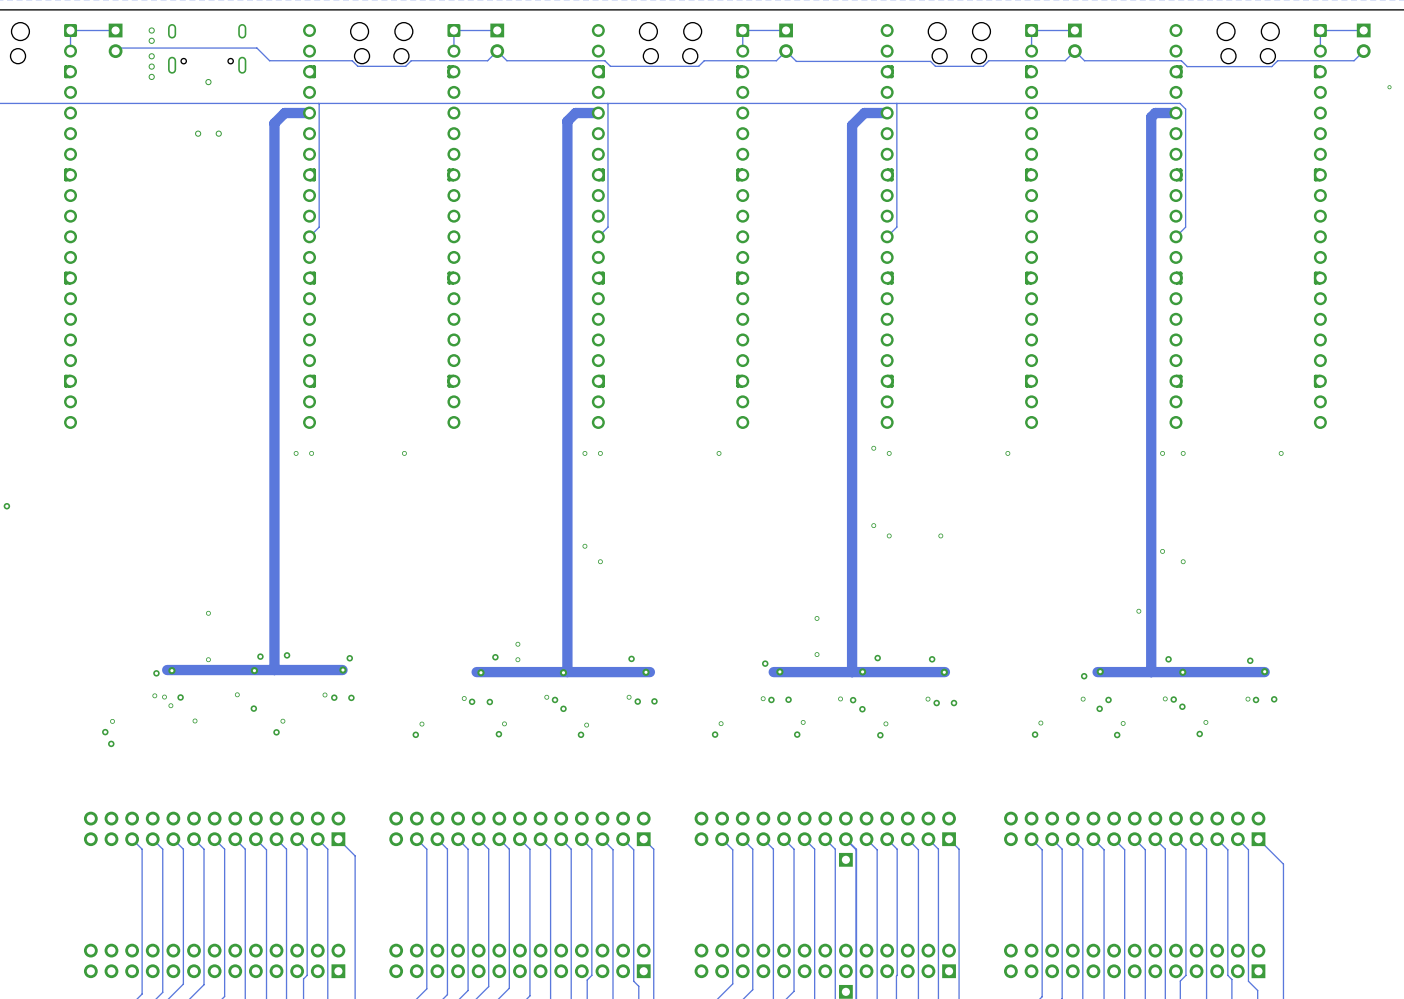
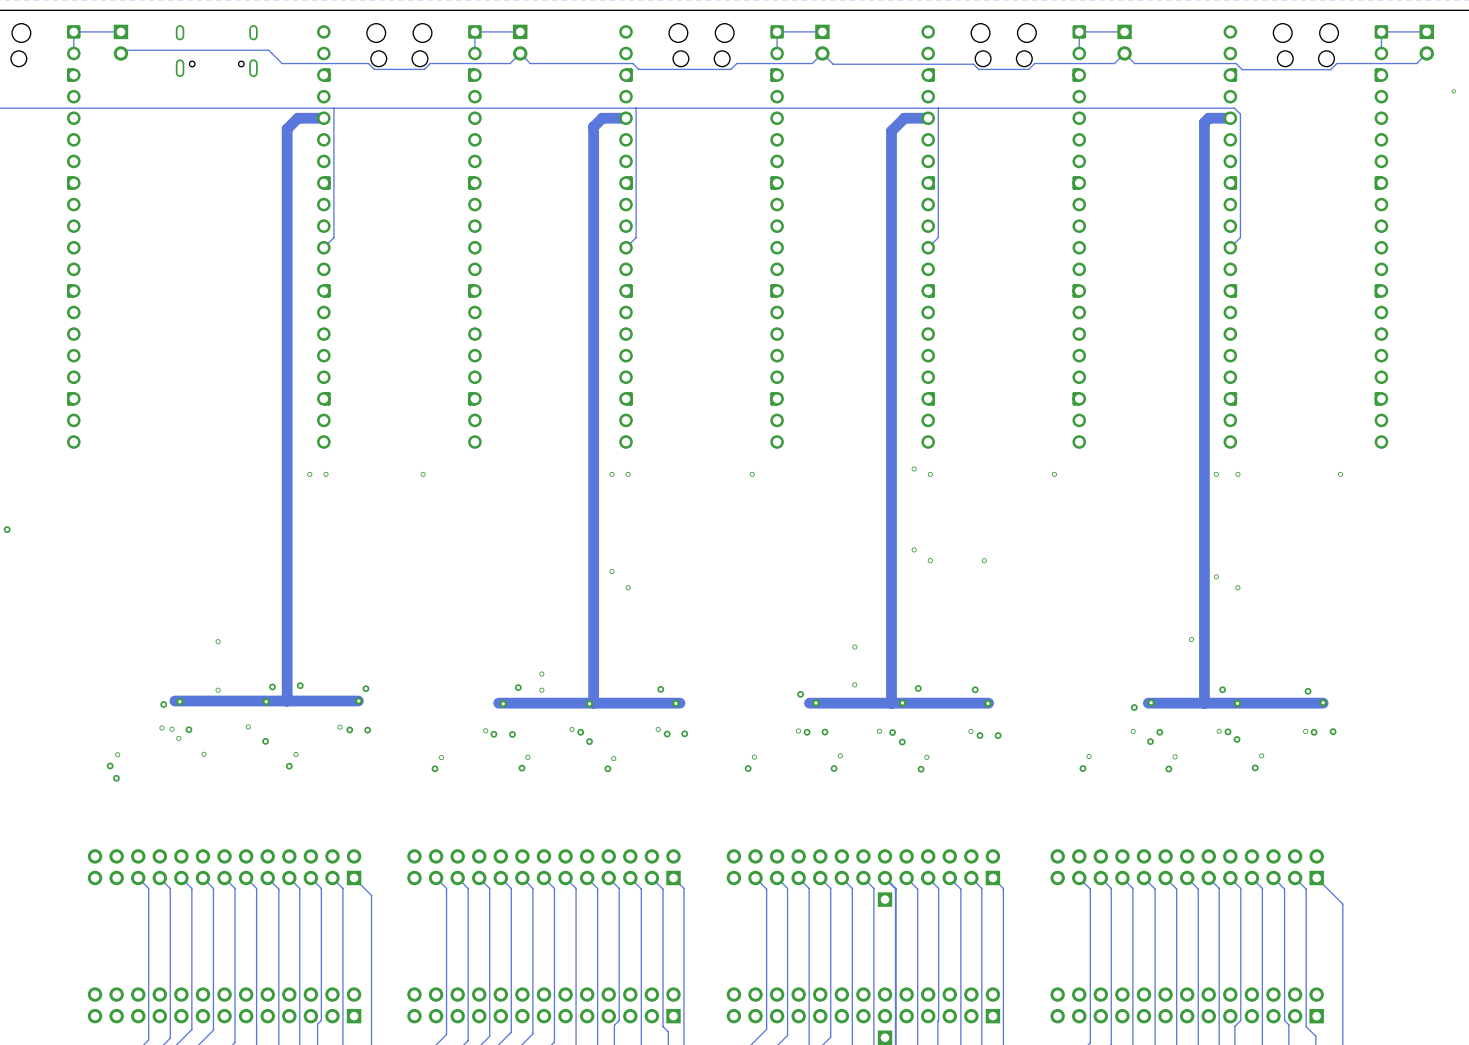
via: (151, 30) -> none
via: (151, 40) -> none
via: (151, 56) -> none
via: (151, 66) -> none
via: (151, 76) -> none
via: (208, 82) -> none
via: (198, 133) -> none
via: (218, 133) -> none

